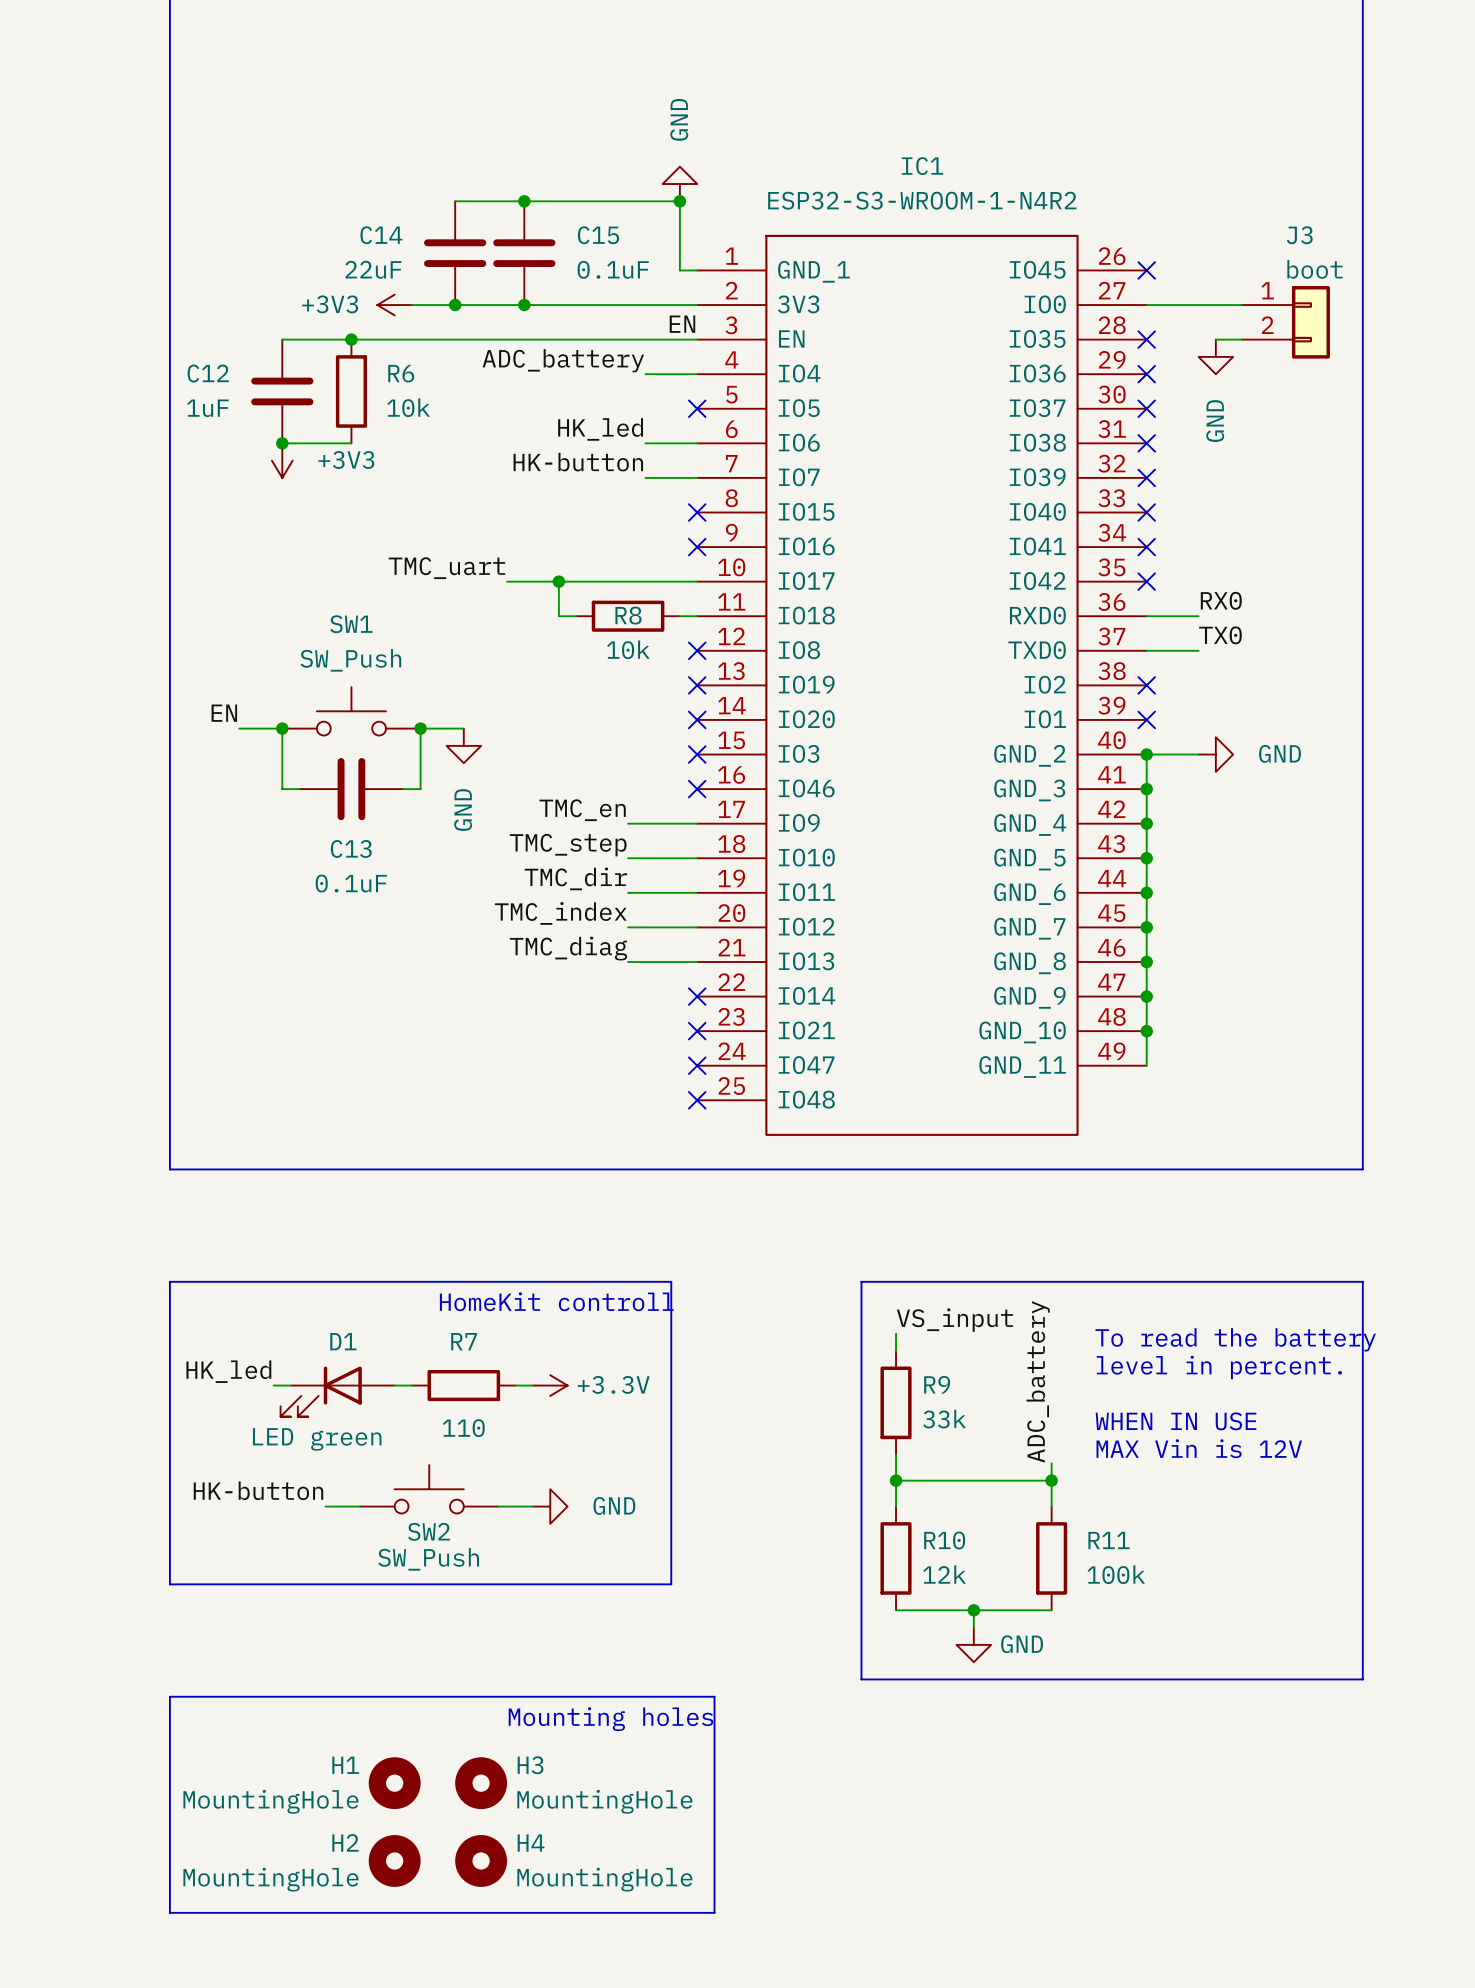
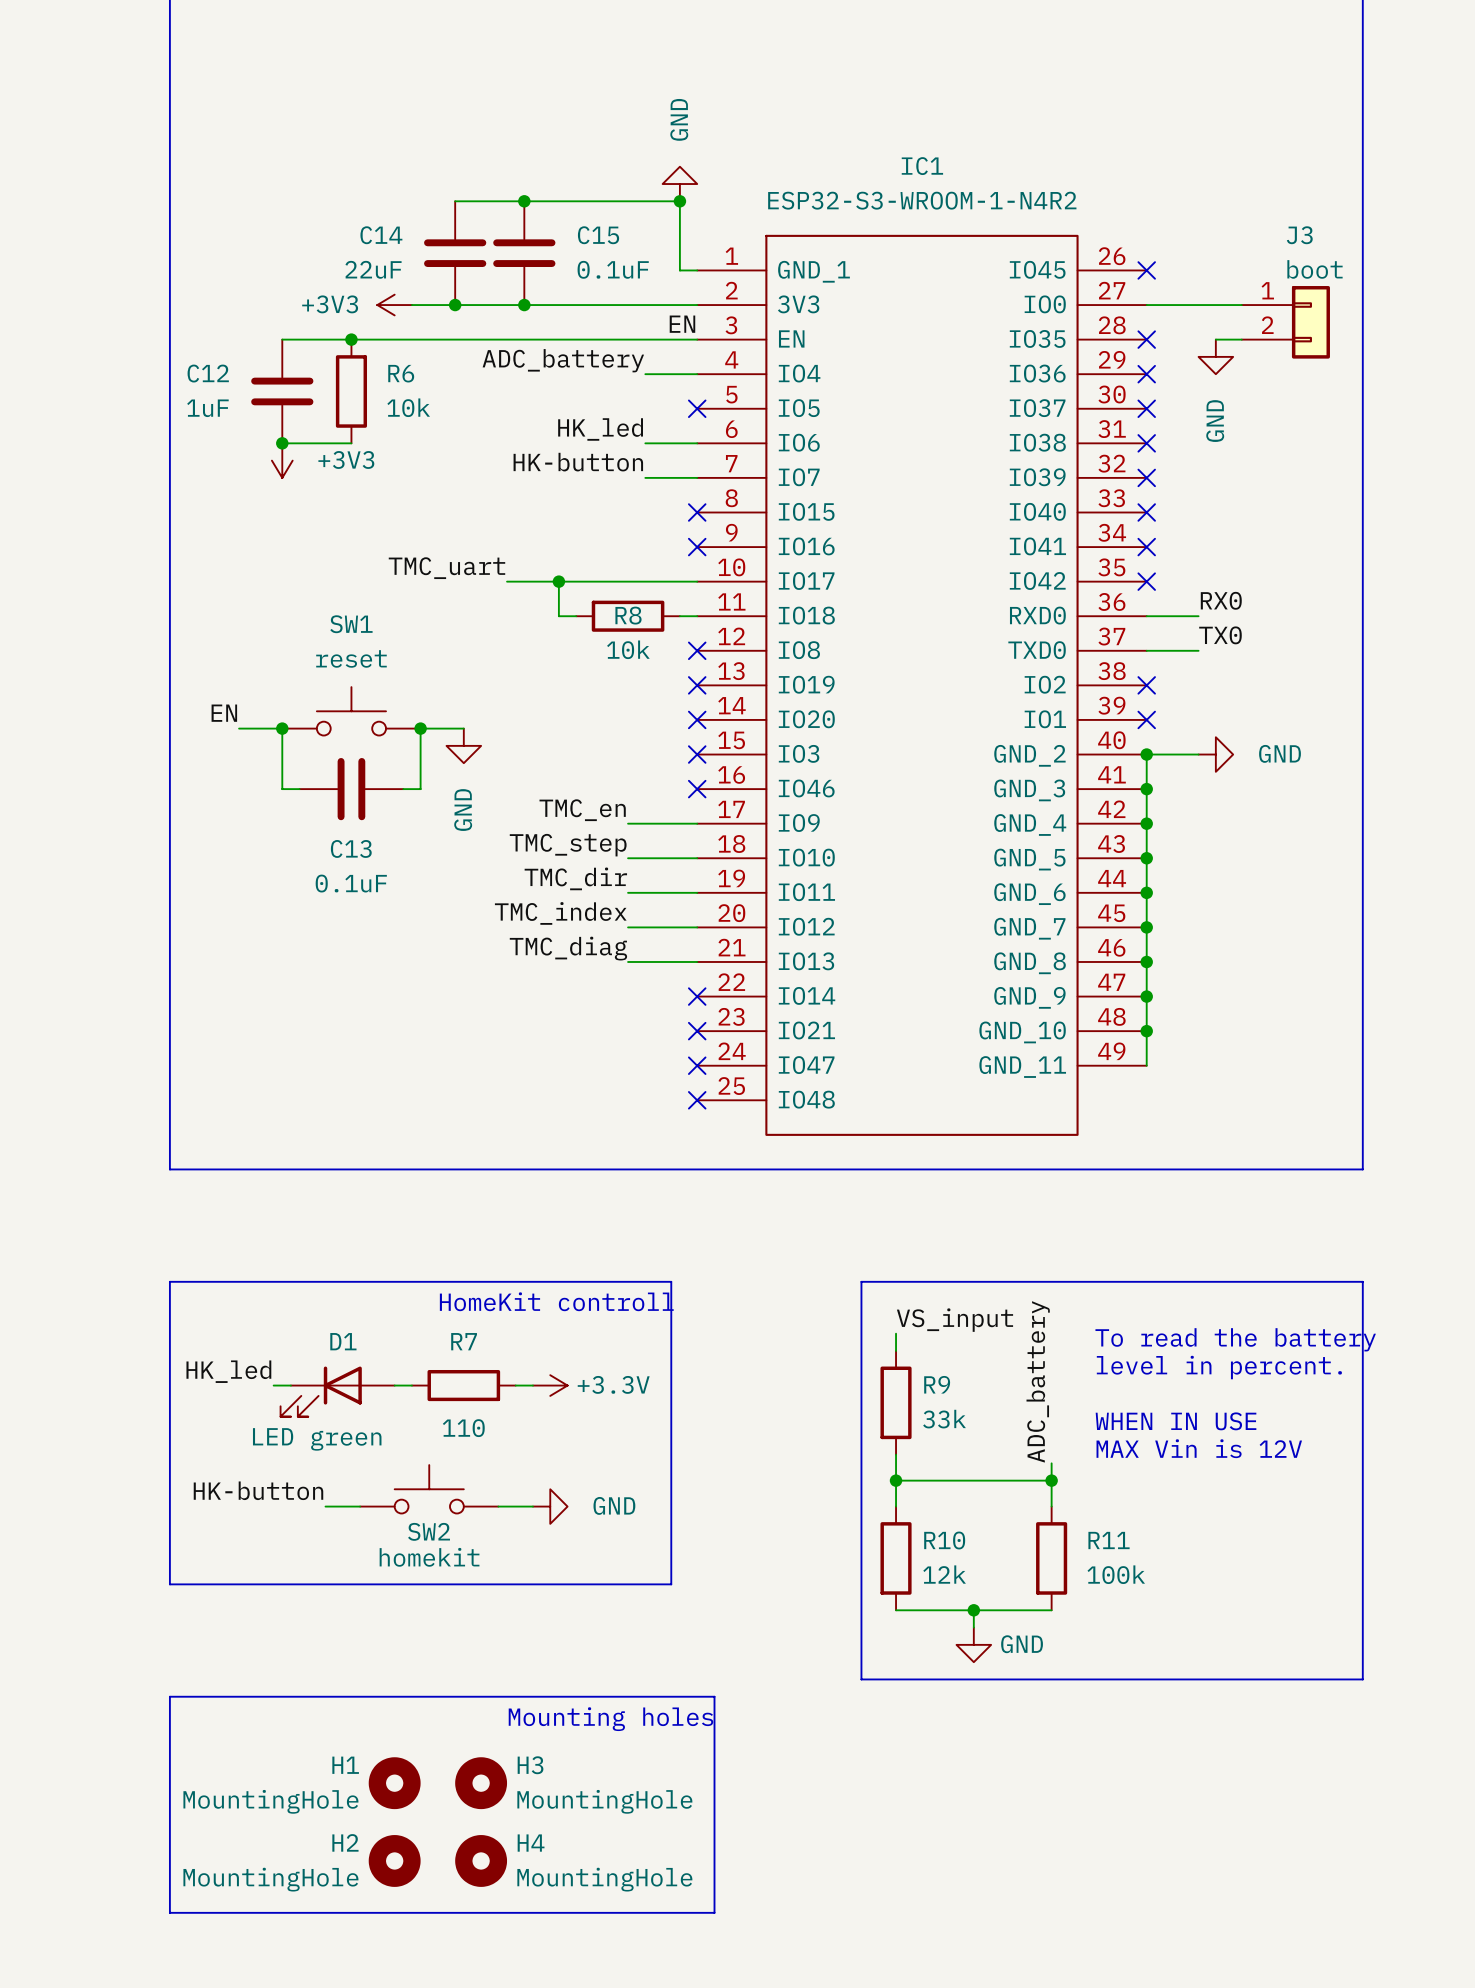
SW1 value: SW_Push (350, 660) -> reset (351, 658)
SW2 value: SW_Push (428, 1559) -> homekit (429, 1557)

